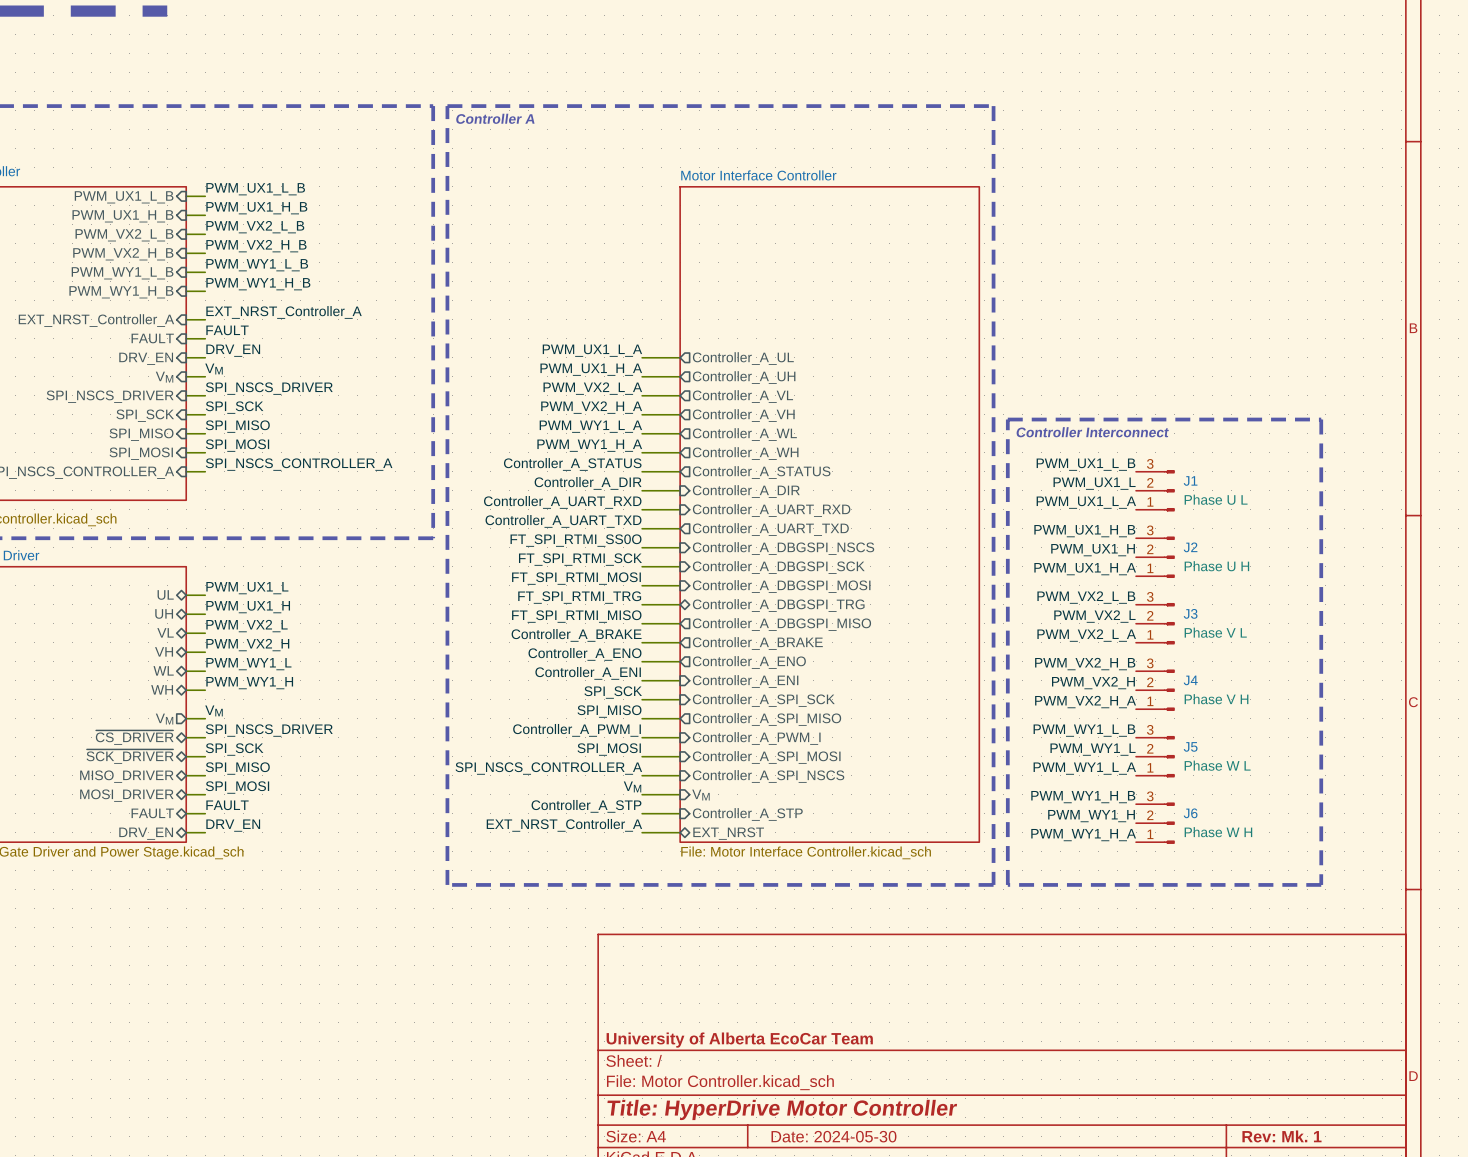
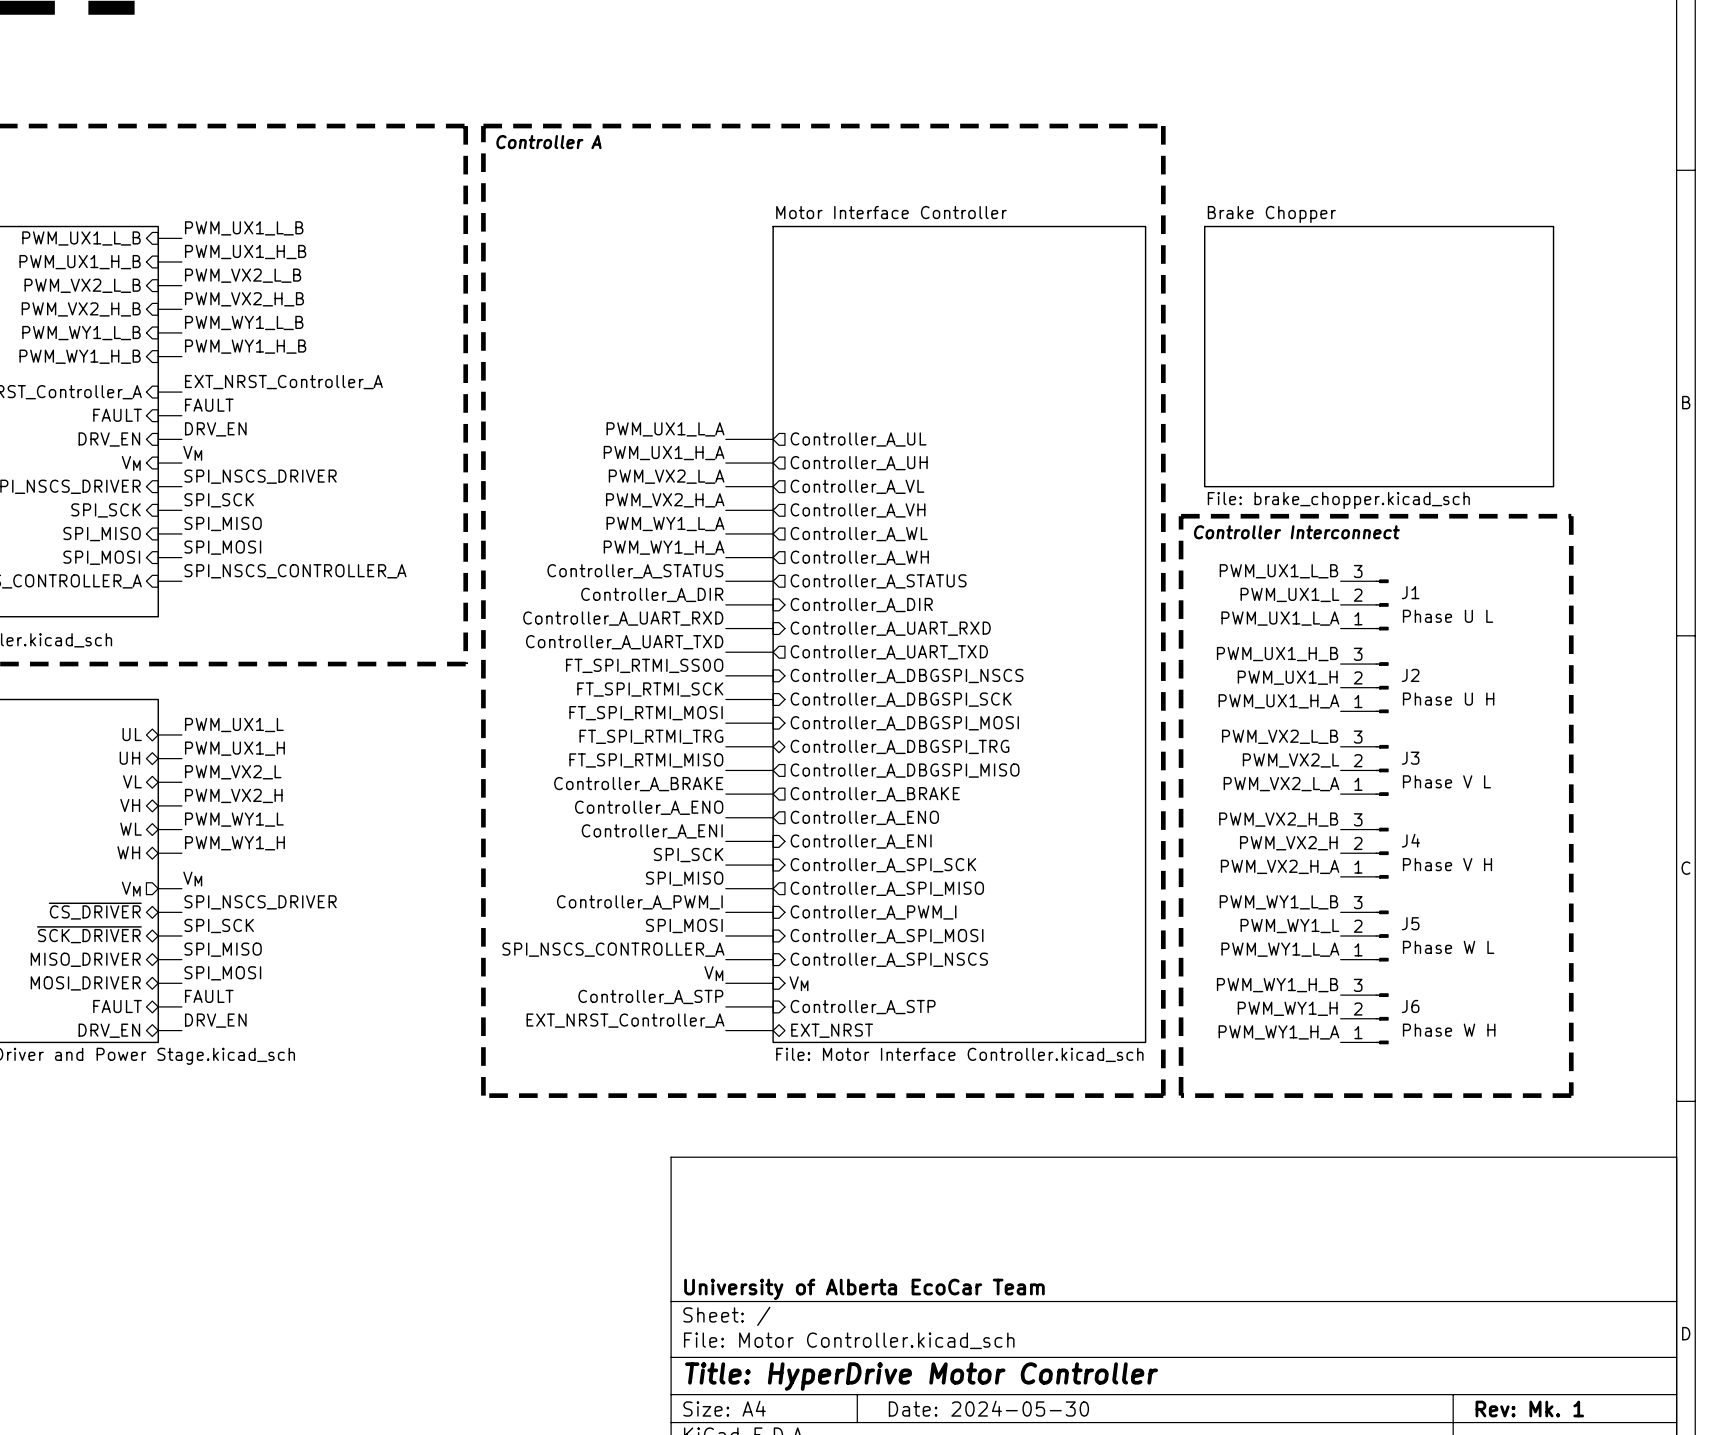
sheet Brake Chopper: none -> File: brake_chopper.kicad_sch (1379, 356)

